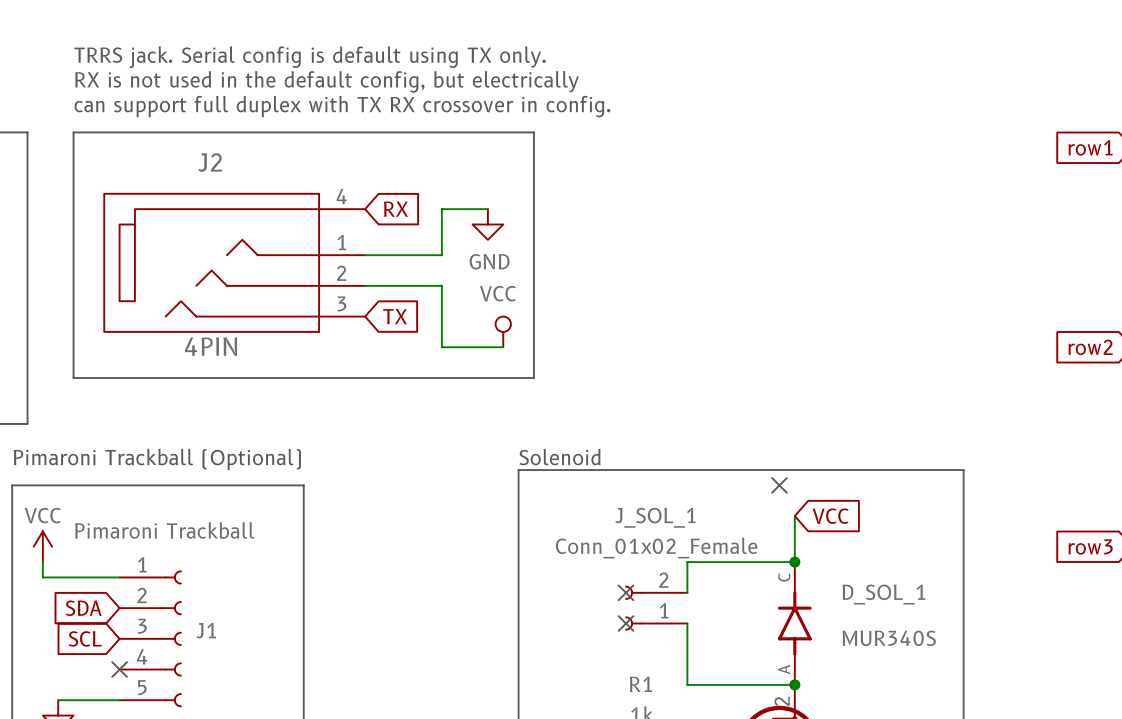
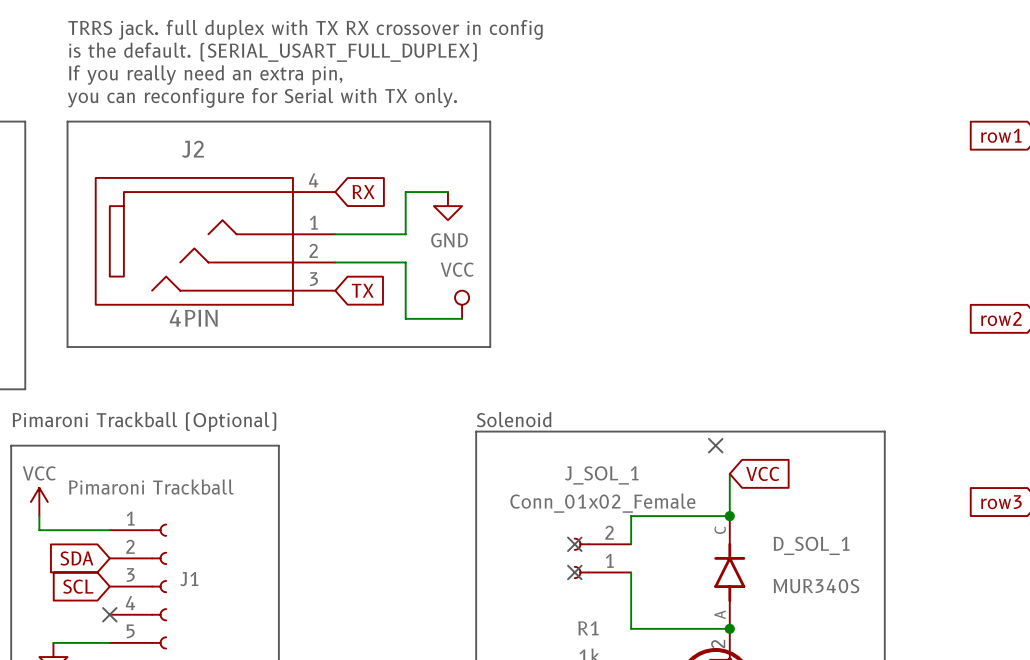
text: none -> TRRS jack. full duplex with TX RX crossover in config (305, 29)
text: TRRS jack. Serial config is default using TX only. (310, 57) -> is the default. (SERIAL_USART_FULL_DUPLEX) (273, 52)
text: RX is not used in the default config, but electrically (326, 81) -> If you really need an extra pin, (205, 75)
text: can support full duplex with TX RX crossover in config. (342, 106) -> you can reconfigure for Serial with TX only. (262, 97)

